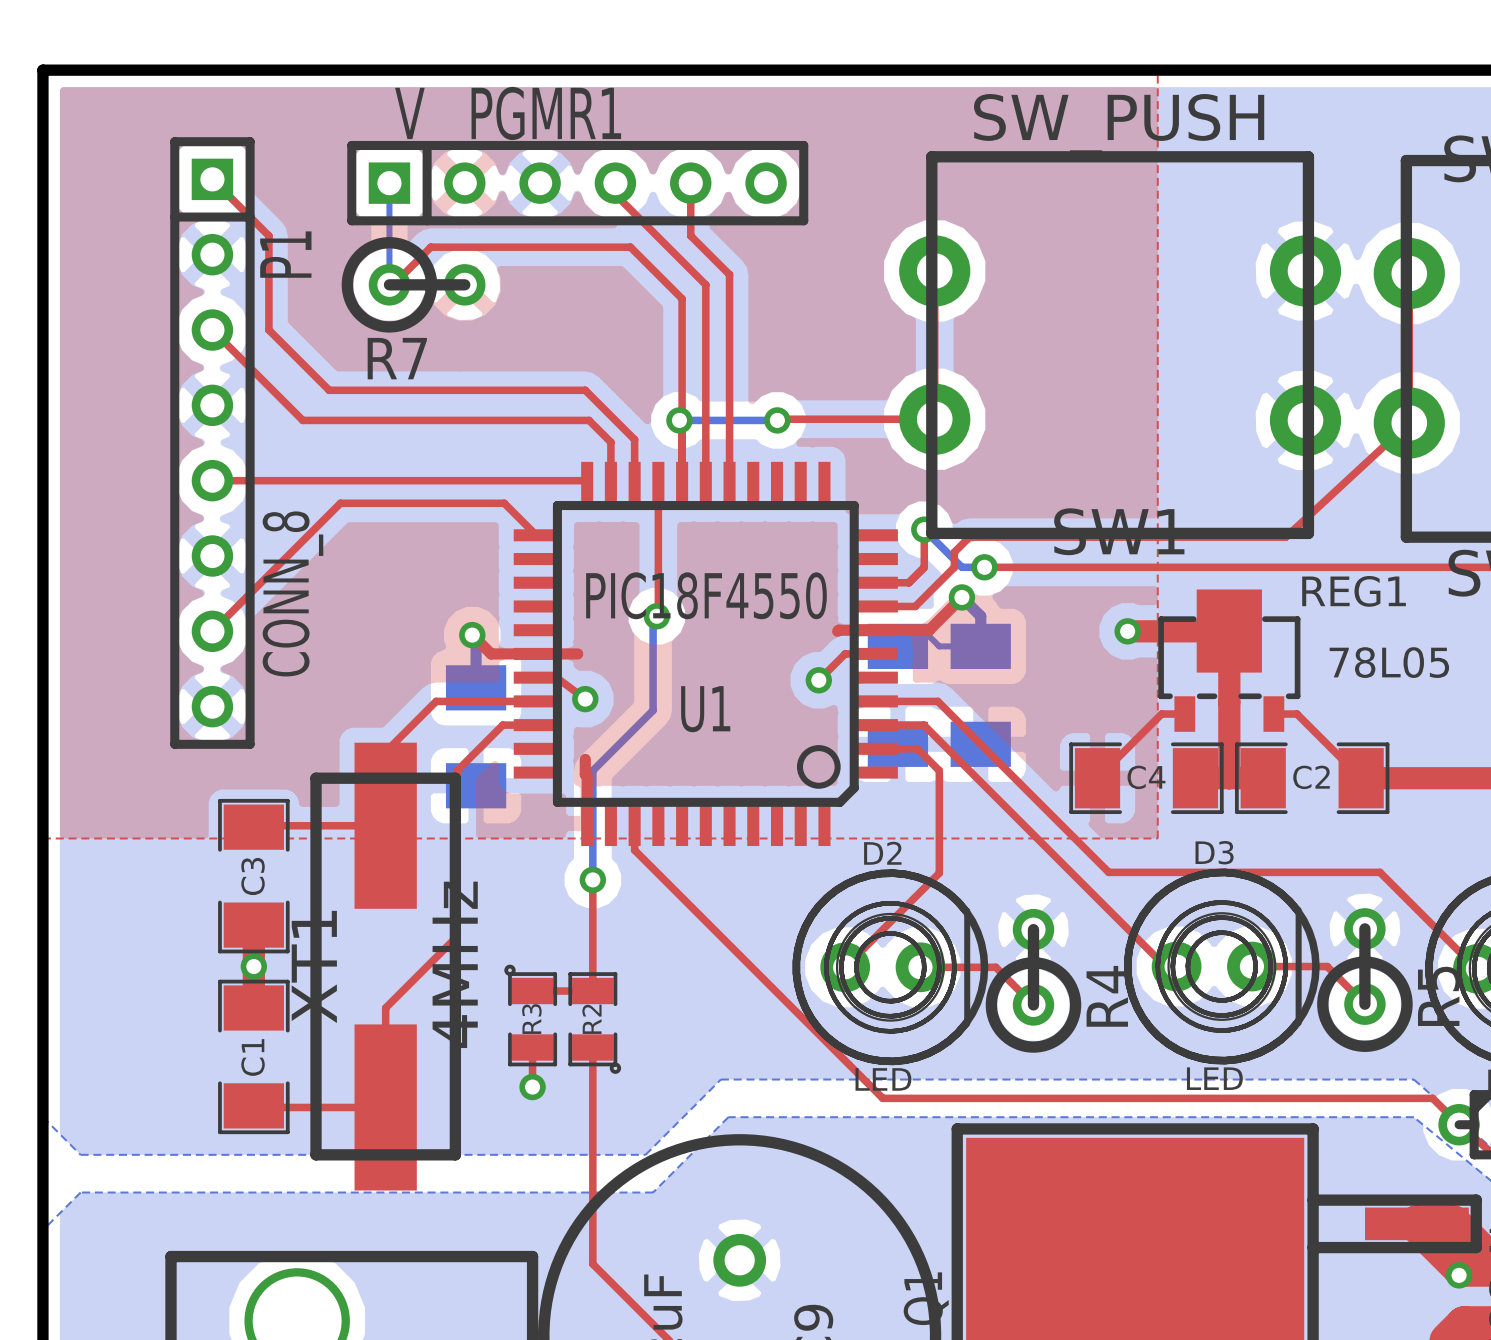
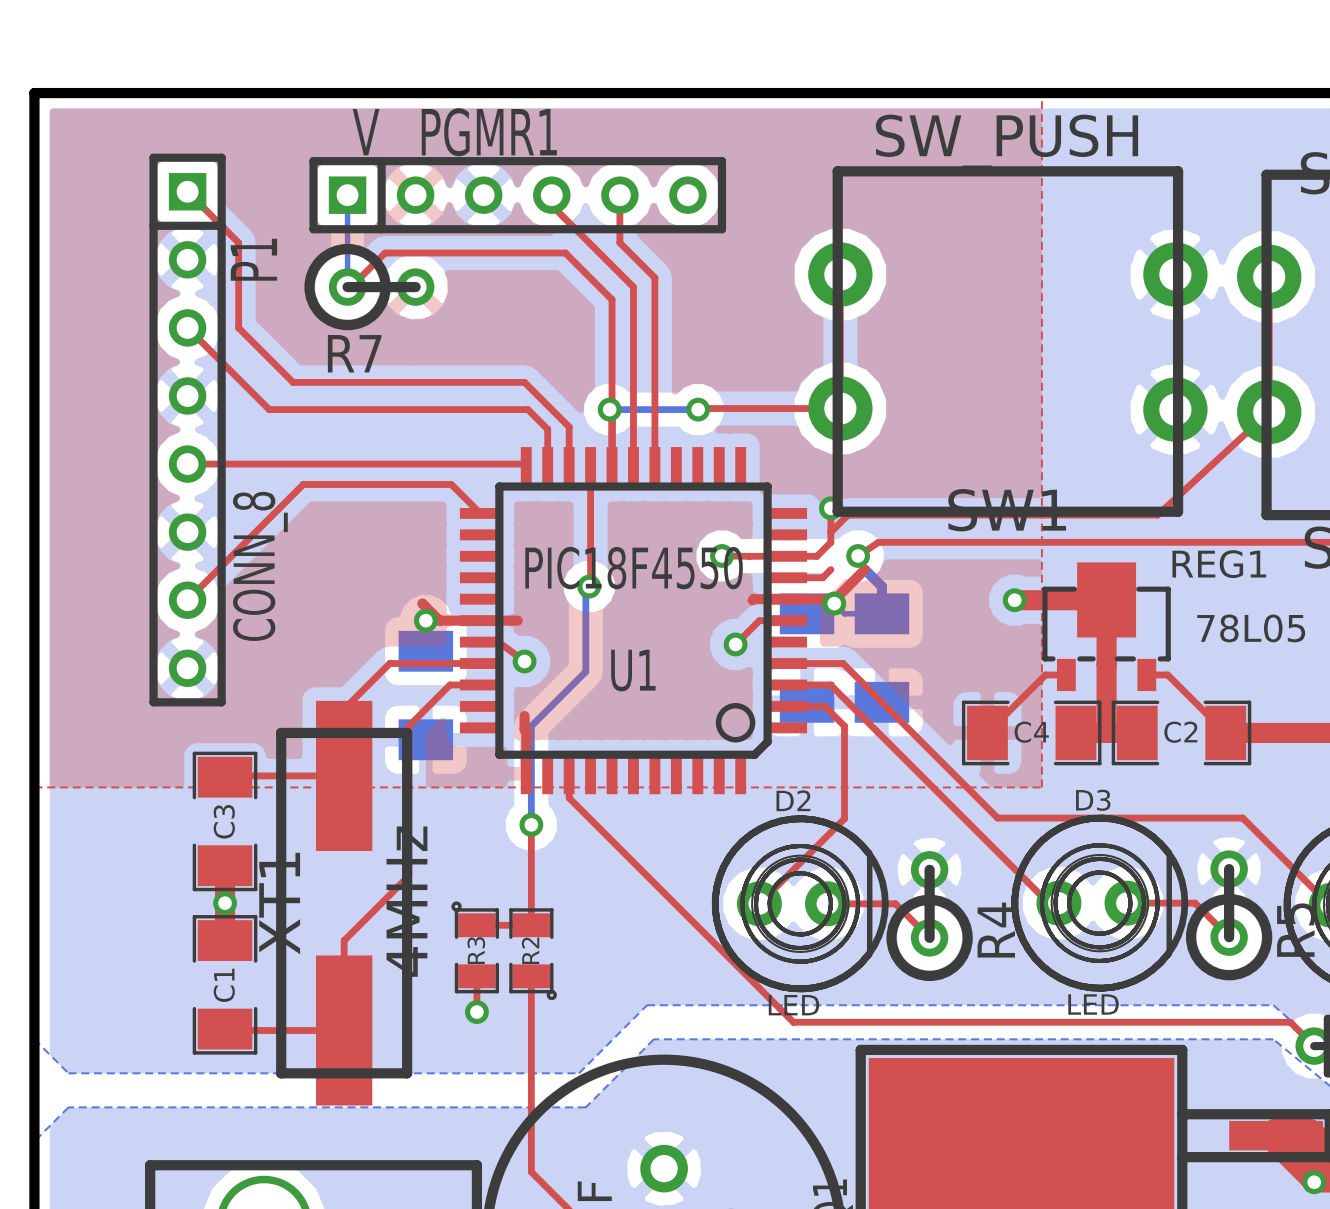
bottom track: (924, 529) (961, 567) (984, 567) -> none
top track: (969, 537) (954, 552) (954, 567) (924, 597) -> (871, 515) (847, 515) (830, 532)
top track: none -> (885, 542) (878, 542) (858, 555)
via: (984, 567) -> none
top track: none -> (721, 555) (786, 556)
via: none -> (721, 555)
via position: (961, 597) -> (858, 555)
via position: (472, 635) -> (425, 620)
via: none -> (834, 603)

